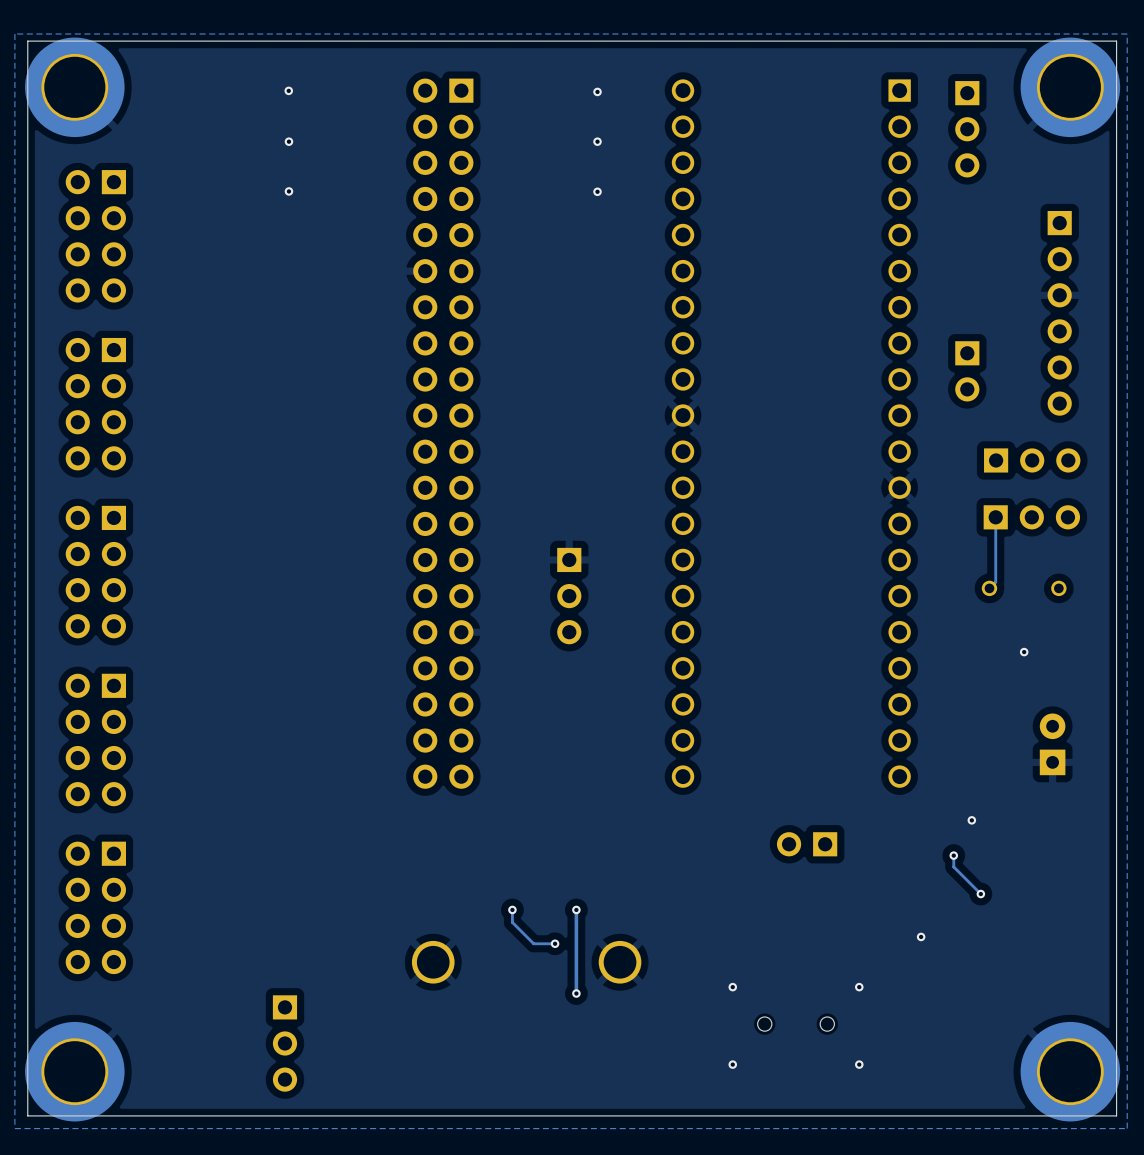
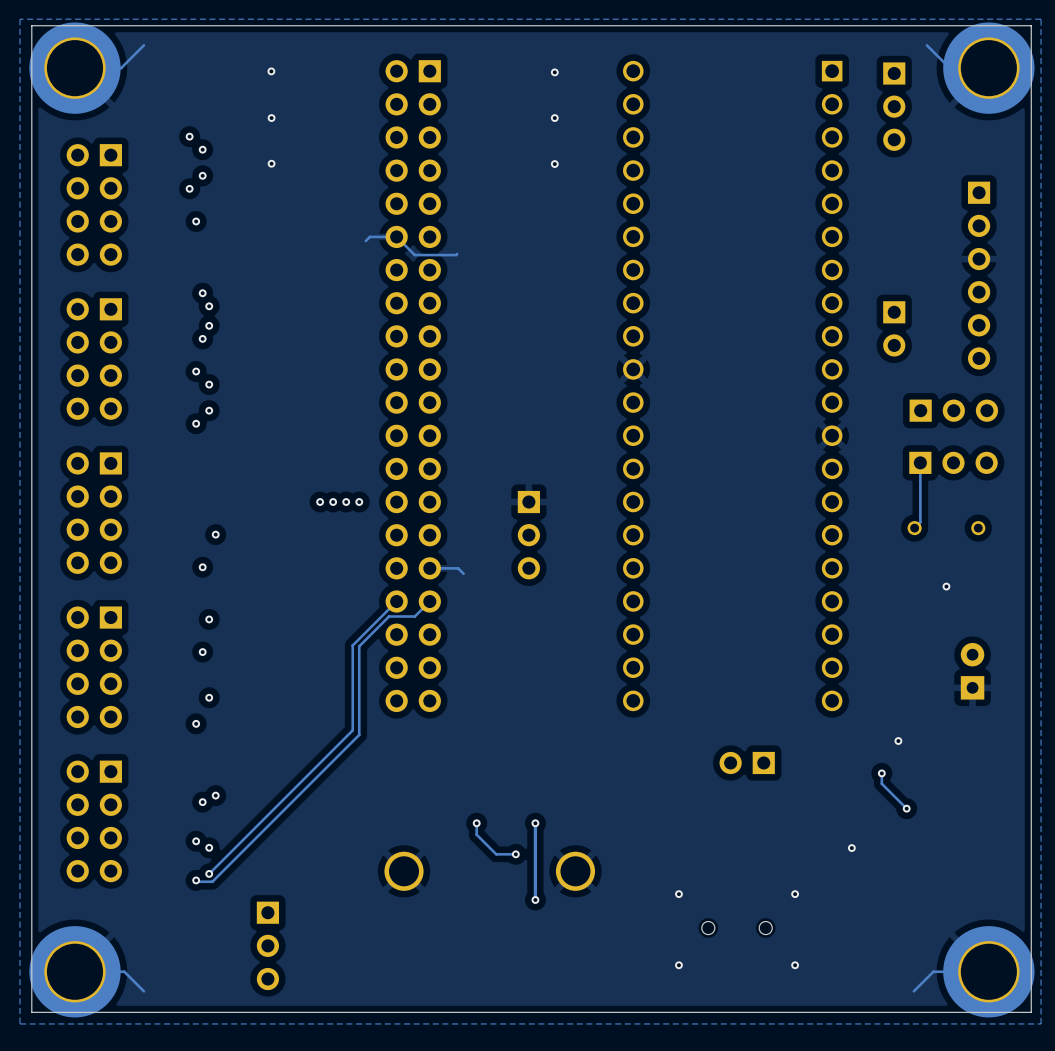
track: none -> (143, 45) (121, 68) (74, 68)
track: none -> (926, 45) (949, 68) (988, 68)
via: none -> (189, 136)
via: none -> (202, 149)
via: none -> (202, 175)
via: none -> (189, 188)
via: none -> (196, 221)
track: none -> (365, 241) (369, 236) (396, 236) (414, 255) (457, 254)
via: none -> (202, 293)
via: none -> (209, 306)
via: none -> (209, 325)
via: none -> (202, 338)
via: none -> (196, 371)
via: none -> (209, 384)
via: none -> (209, 410)
via: none -> (196, 423)
via: none -> (320, 502)
via: none -> (333, 502)
via: none -> (346, 502)
via: none -> (359, 502)
via: none -> (215, 534)
via: none -> (202, 567)
track: none -> (429, 568) (458, 568) (463, 573)
track: none -> (396, 601) (352, 645) (352, 730) (209, 873)
track: none -> (429, 601) (414, 616) (389, 616) (359, 646) (359, 734) (212, 881) (196, 880)
via: none -> (209, 619)
via: none -> (202, 652)
via: none -> (209, 697)
via: none -> (196, 723)
via: none -> (215, 795)
via: none -> (202, 802)
via: none -> (196, 841)
via: none -> (209, 847)
via: none -> (209, 873)
via: none -> (196, 880)
track: none -> (74, 971) (124, 971) (143, 991)
track: none -> (988, 971) (933, 971) (913, 991)

